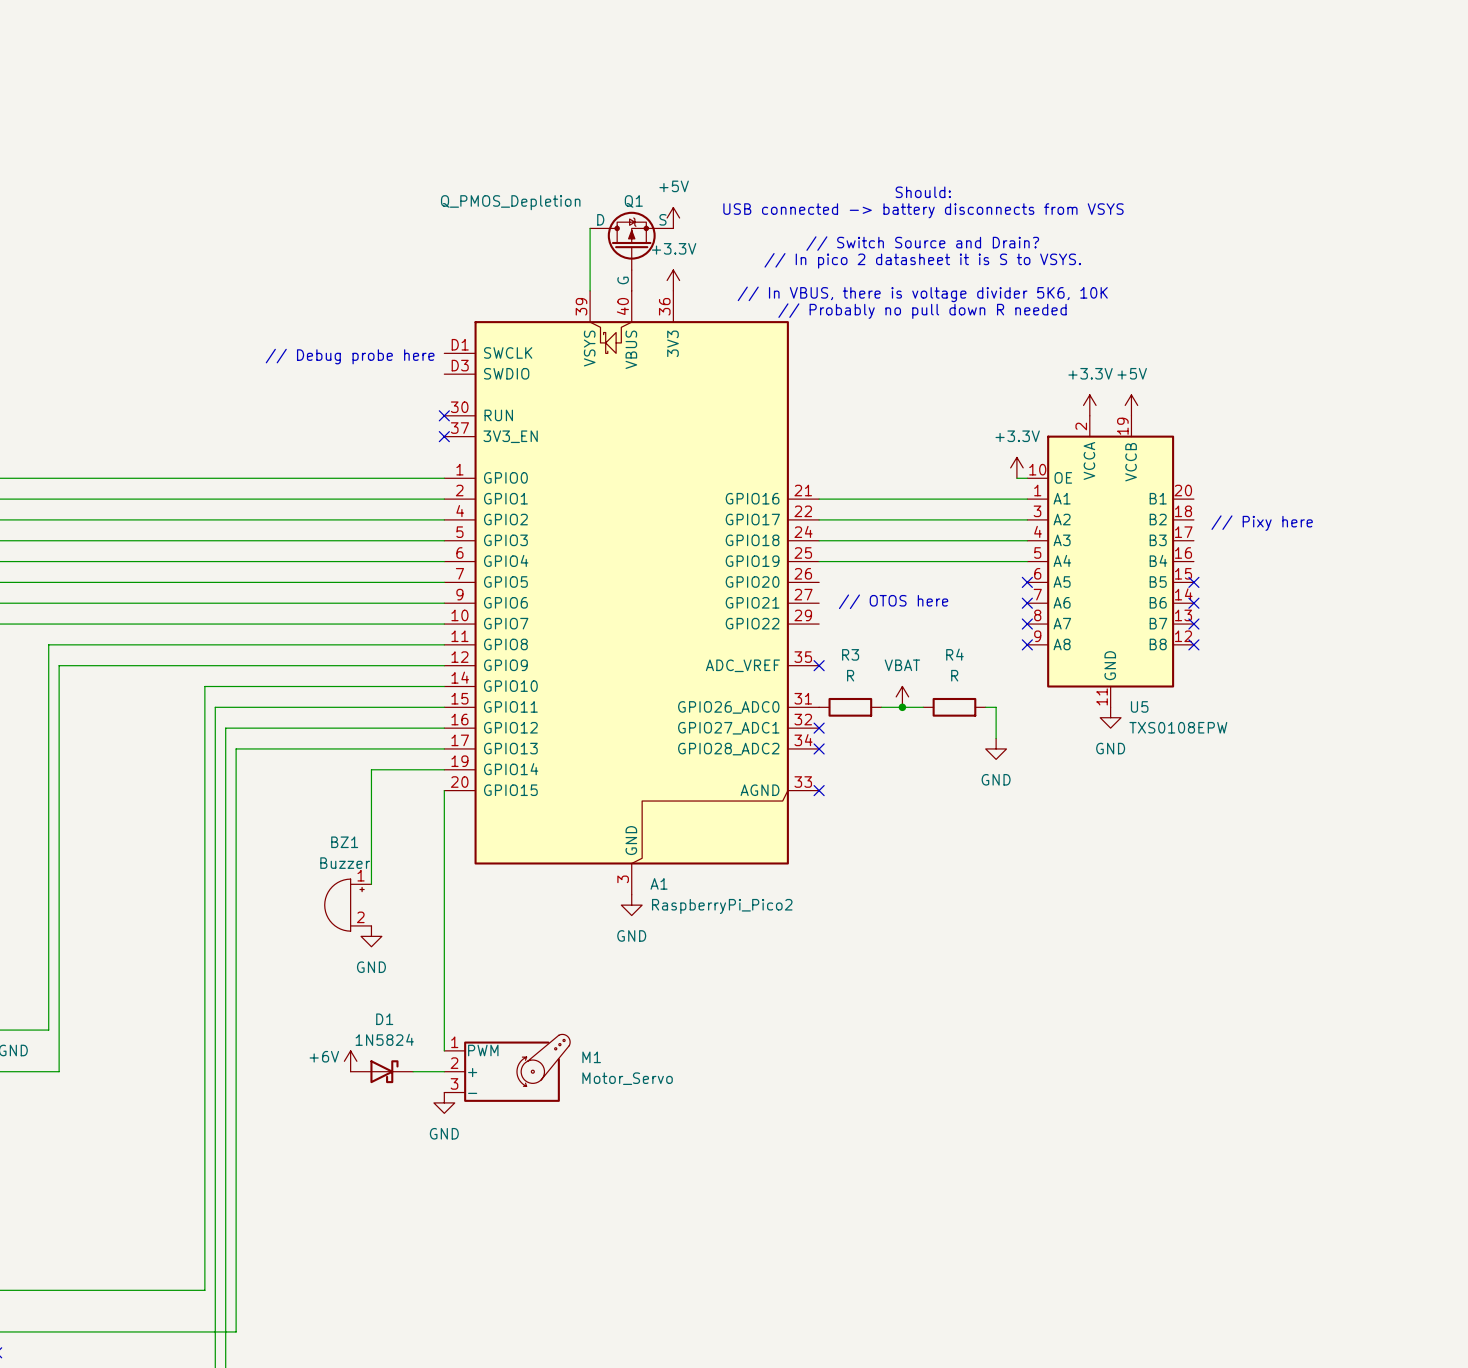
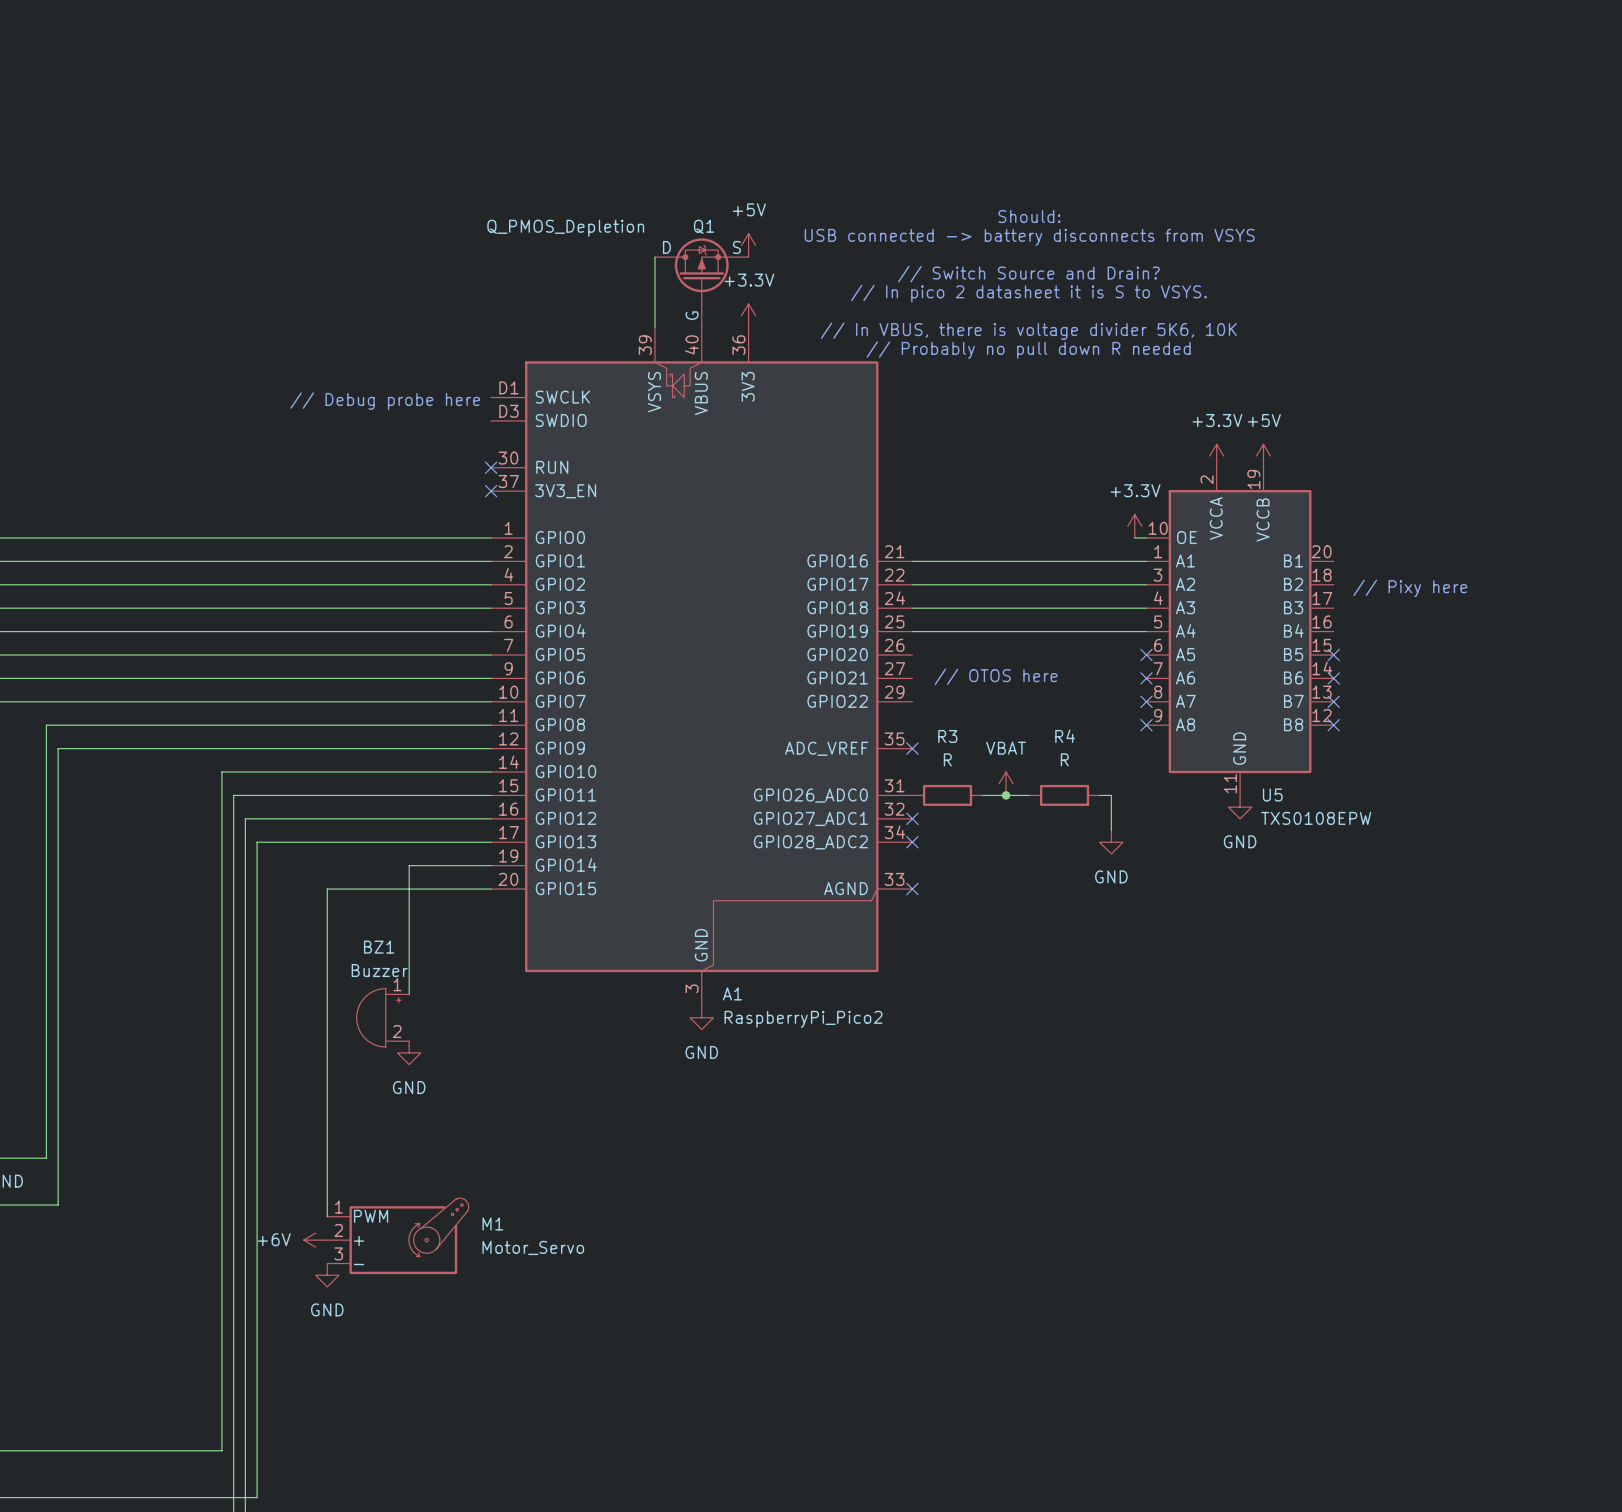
wire: (444, 790) (444, 1050) -> (491, 889) (327, 889) (327, 1216)
power symbol rotation: 0° (350, 1061) -> 90° counterclockwise (315, 1240)
power symbol position: +6V (350, 1061) -> +6V (315, 1240)
M1 position: (507, 1068) -> (397, 1236)
D1: 1N5824 (381, 1071) -> none
wire: (413, 1071) (444, 1071) -> none
power symbol position: GND (444, 1102) -> GND (327, 1275)

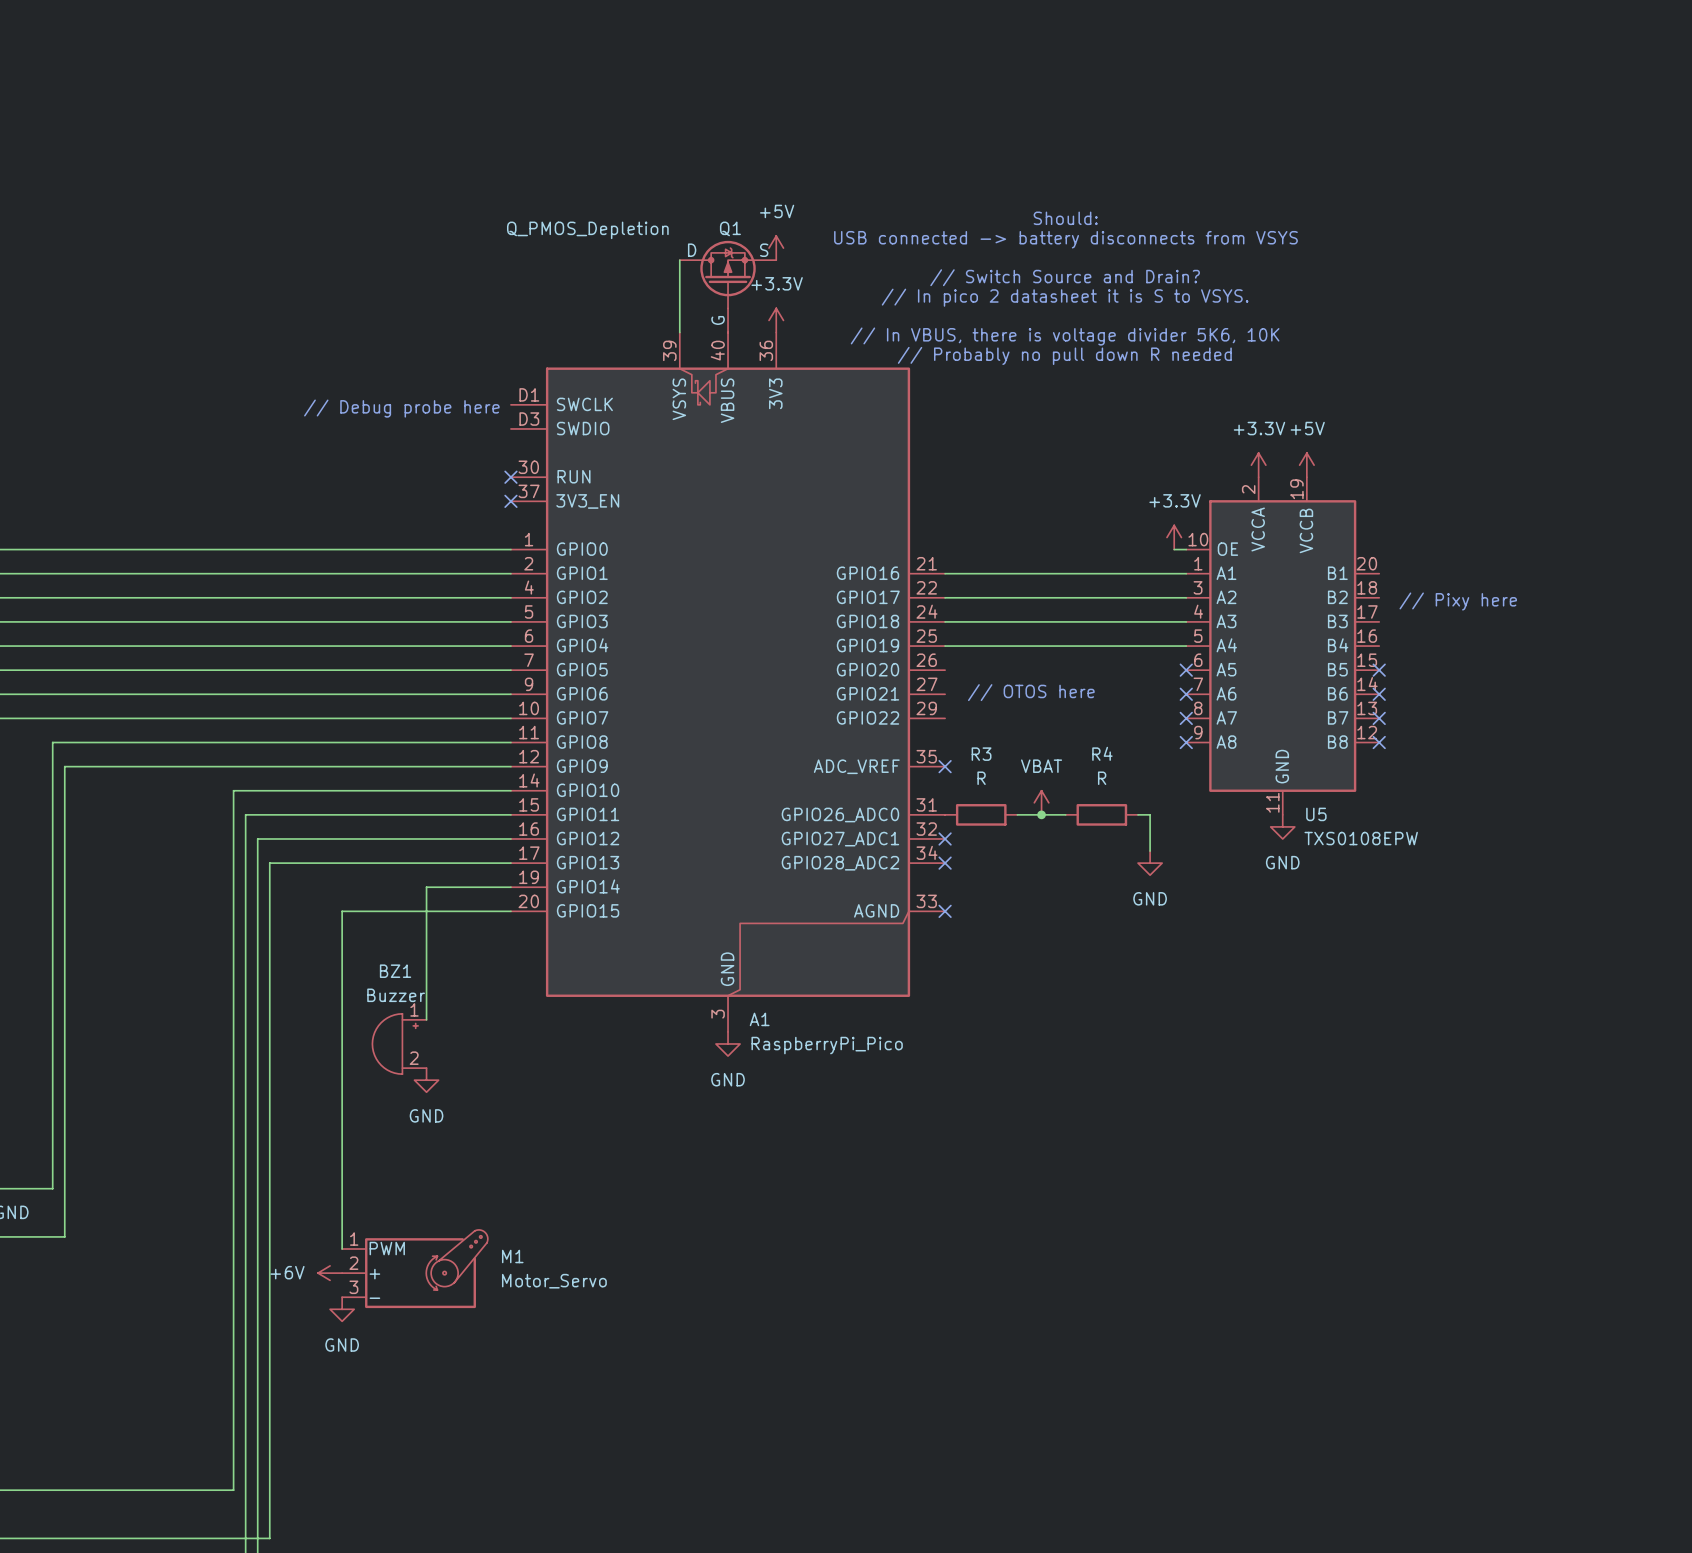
A1 value: RaspberryPi_Pico2 (803, 1019) -> RaspberryPi_Pico (827, 1045)

